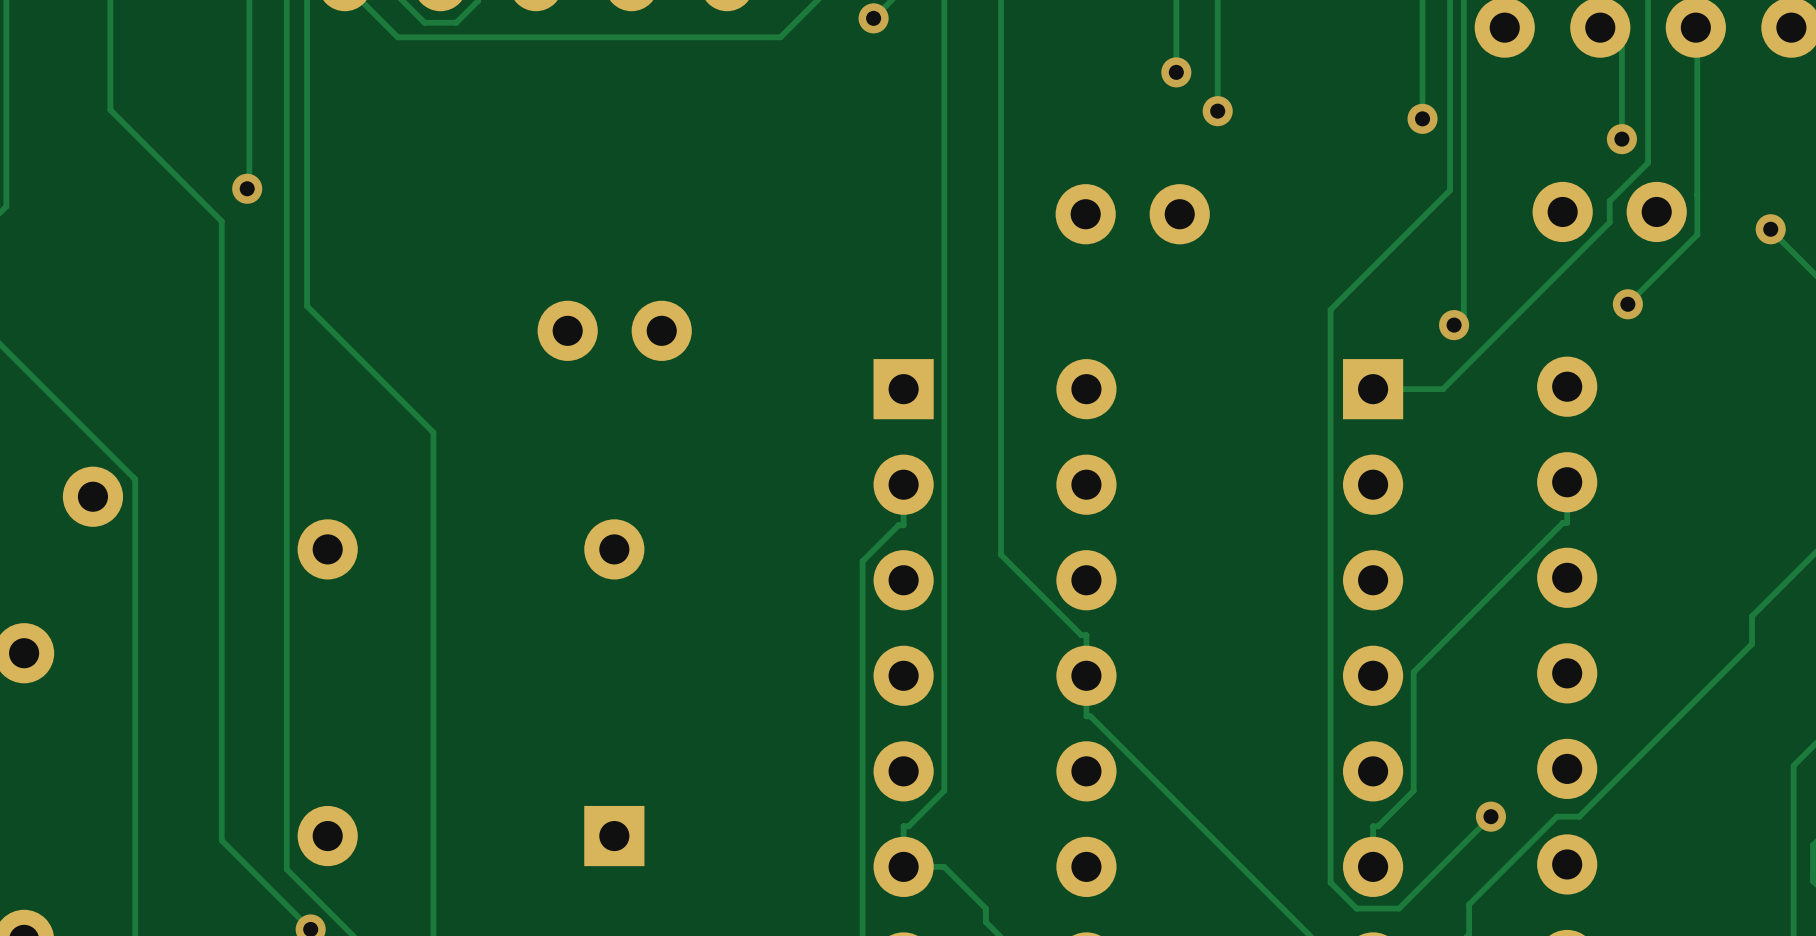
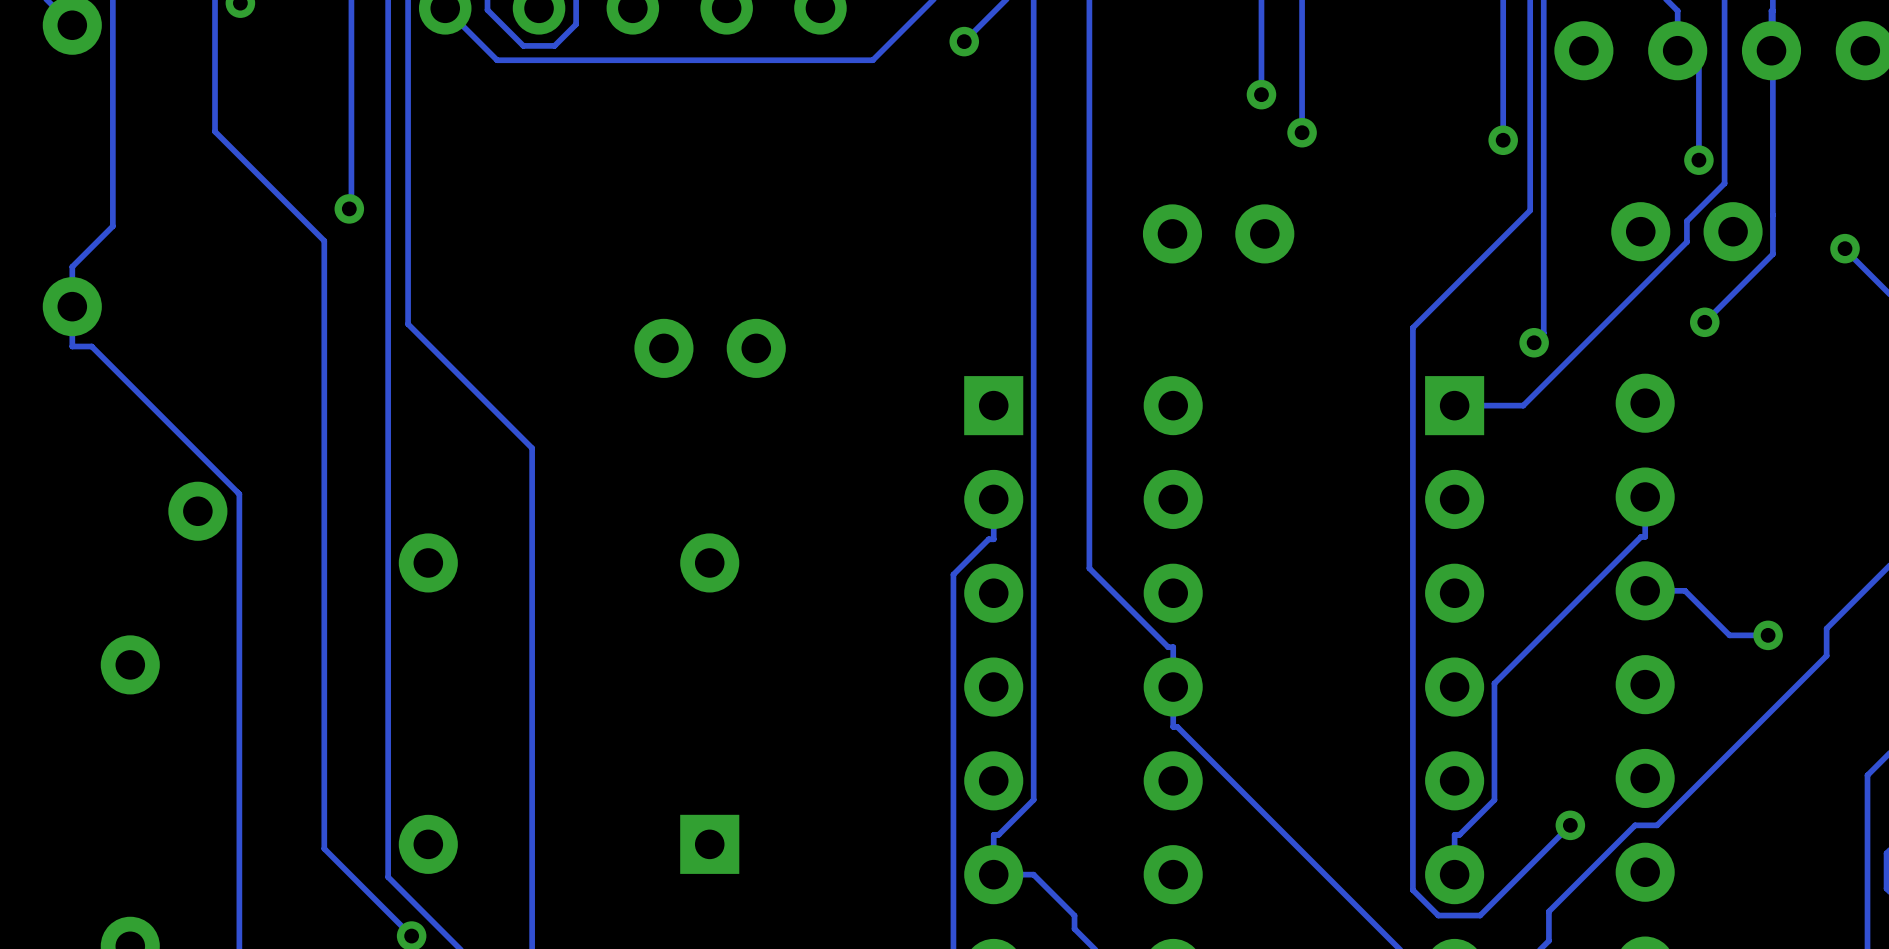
track: none -> (1645, 590) (1685, 590) (1729, 635) (1768, 635)
via: none -> (1768, 635)

